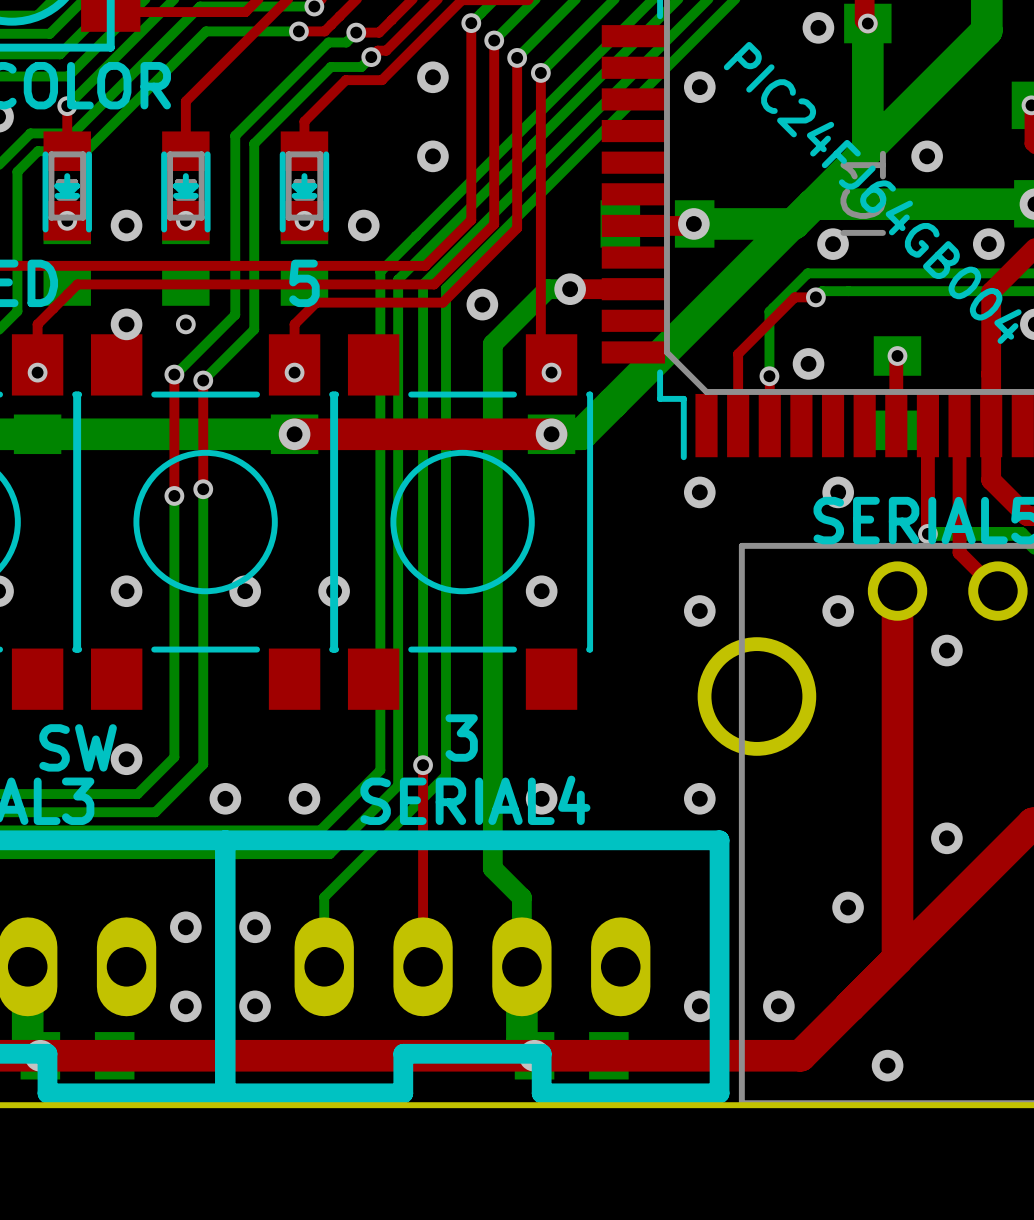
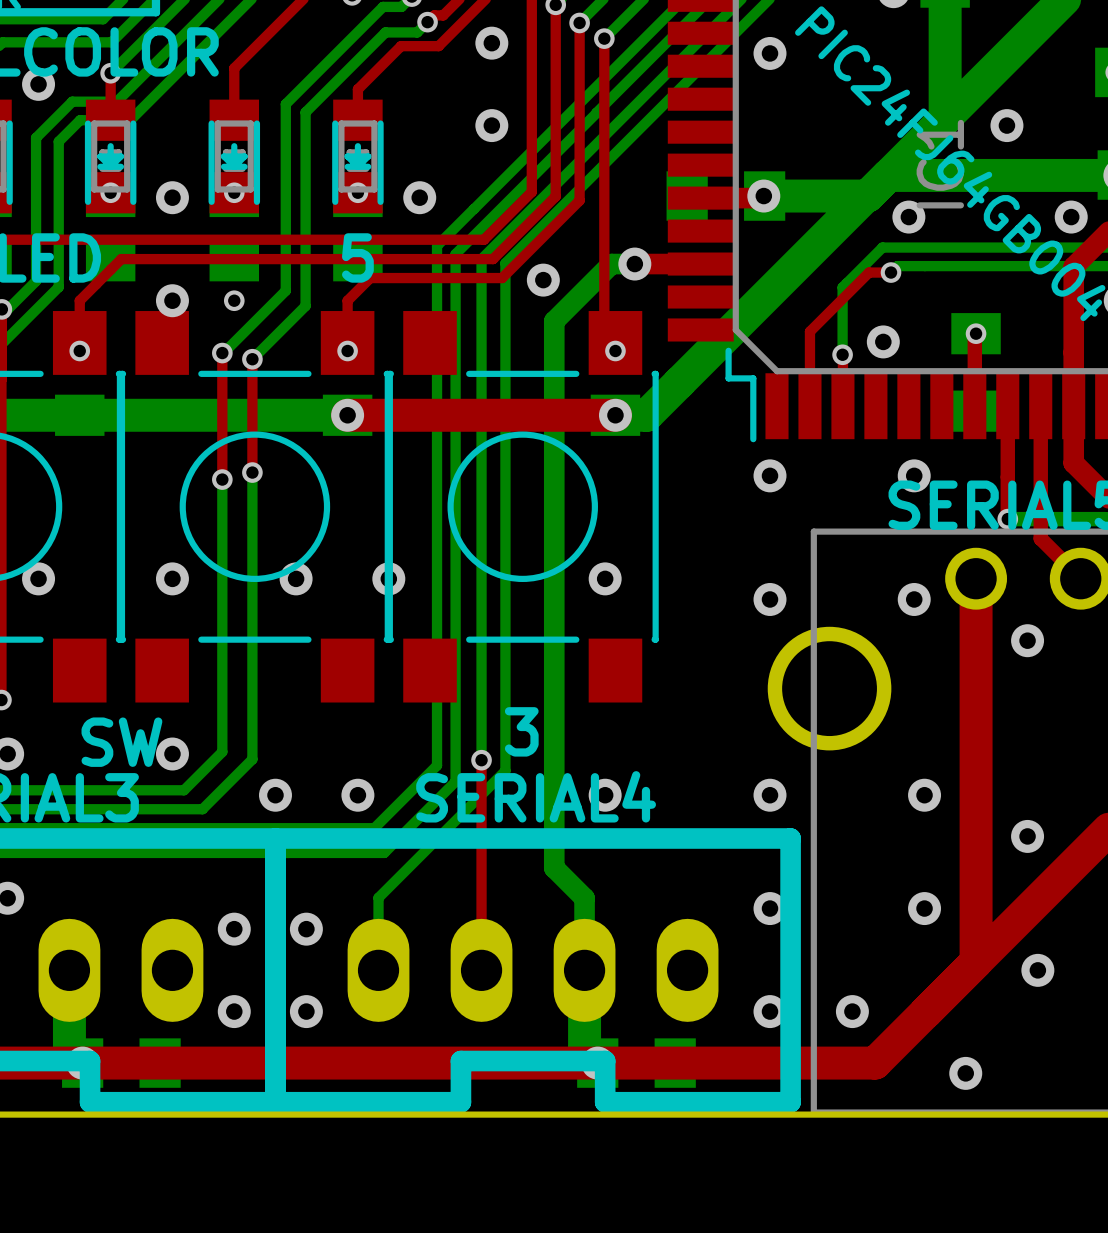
via: none -> (924, 795)
via: none -> (770, 908)
via: none -> (1037, 970)

